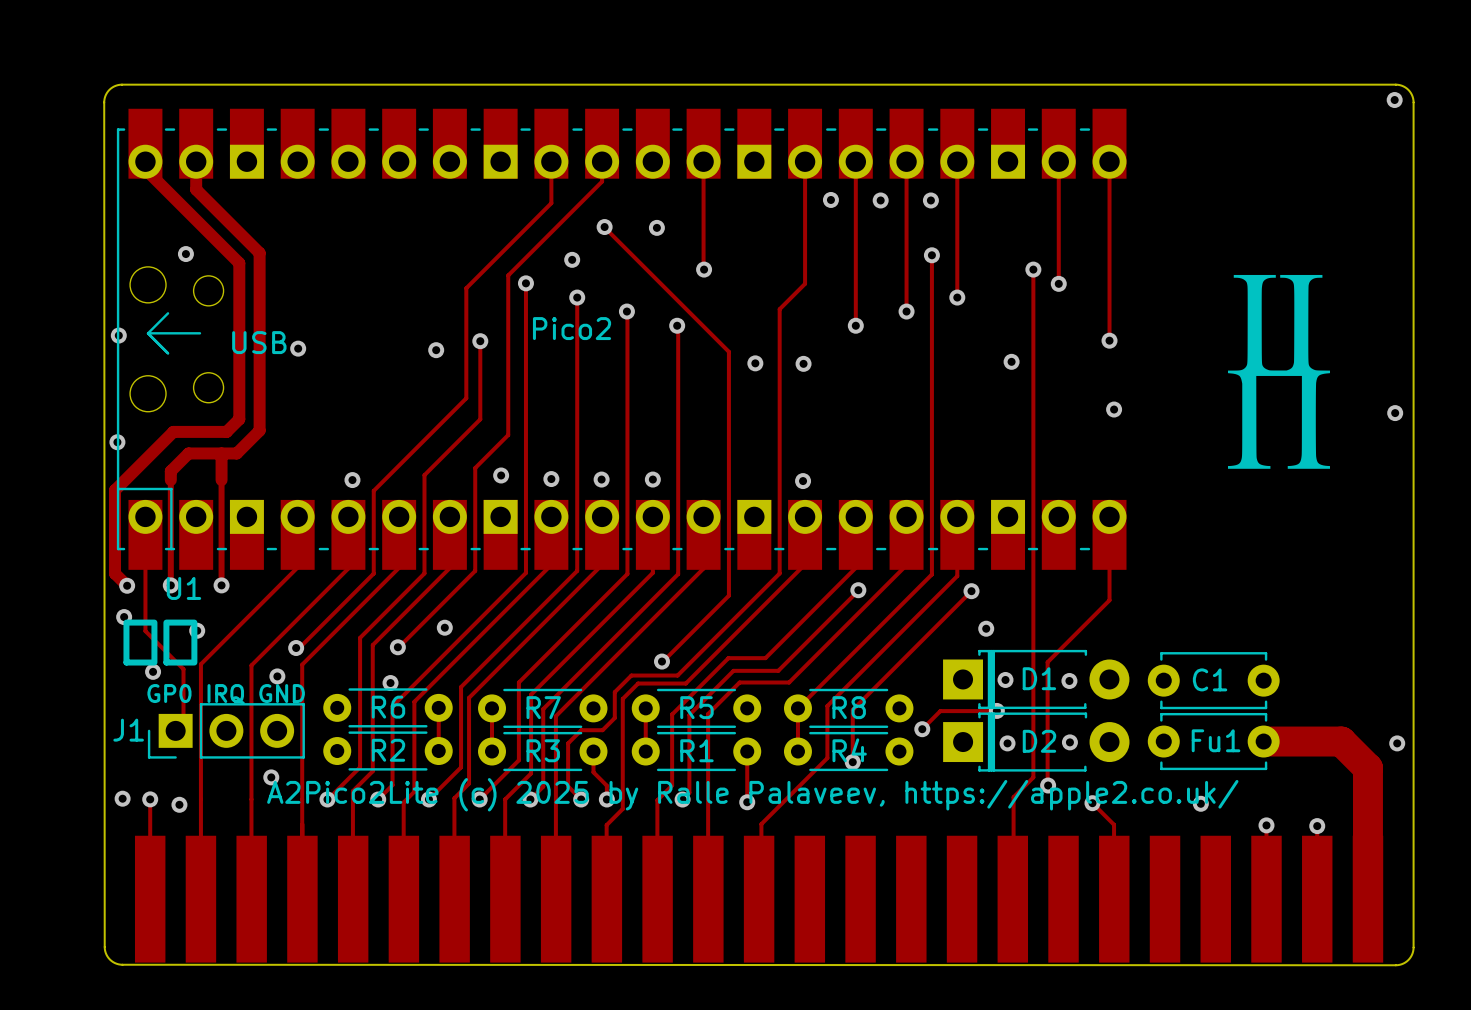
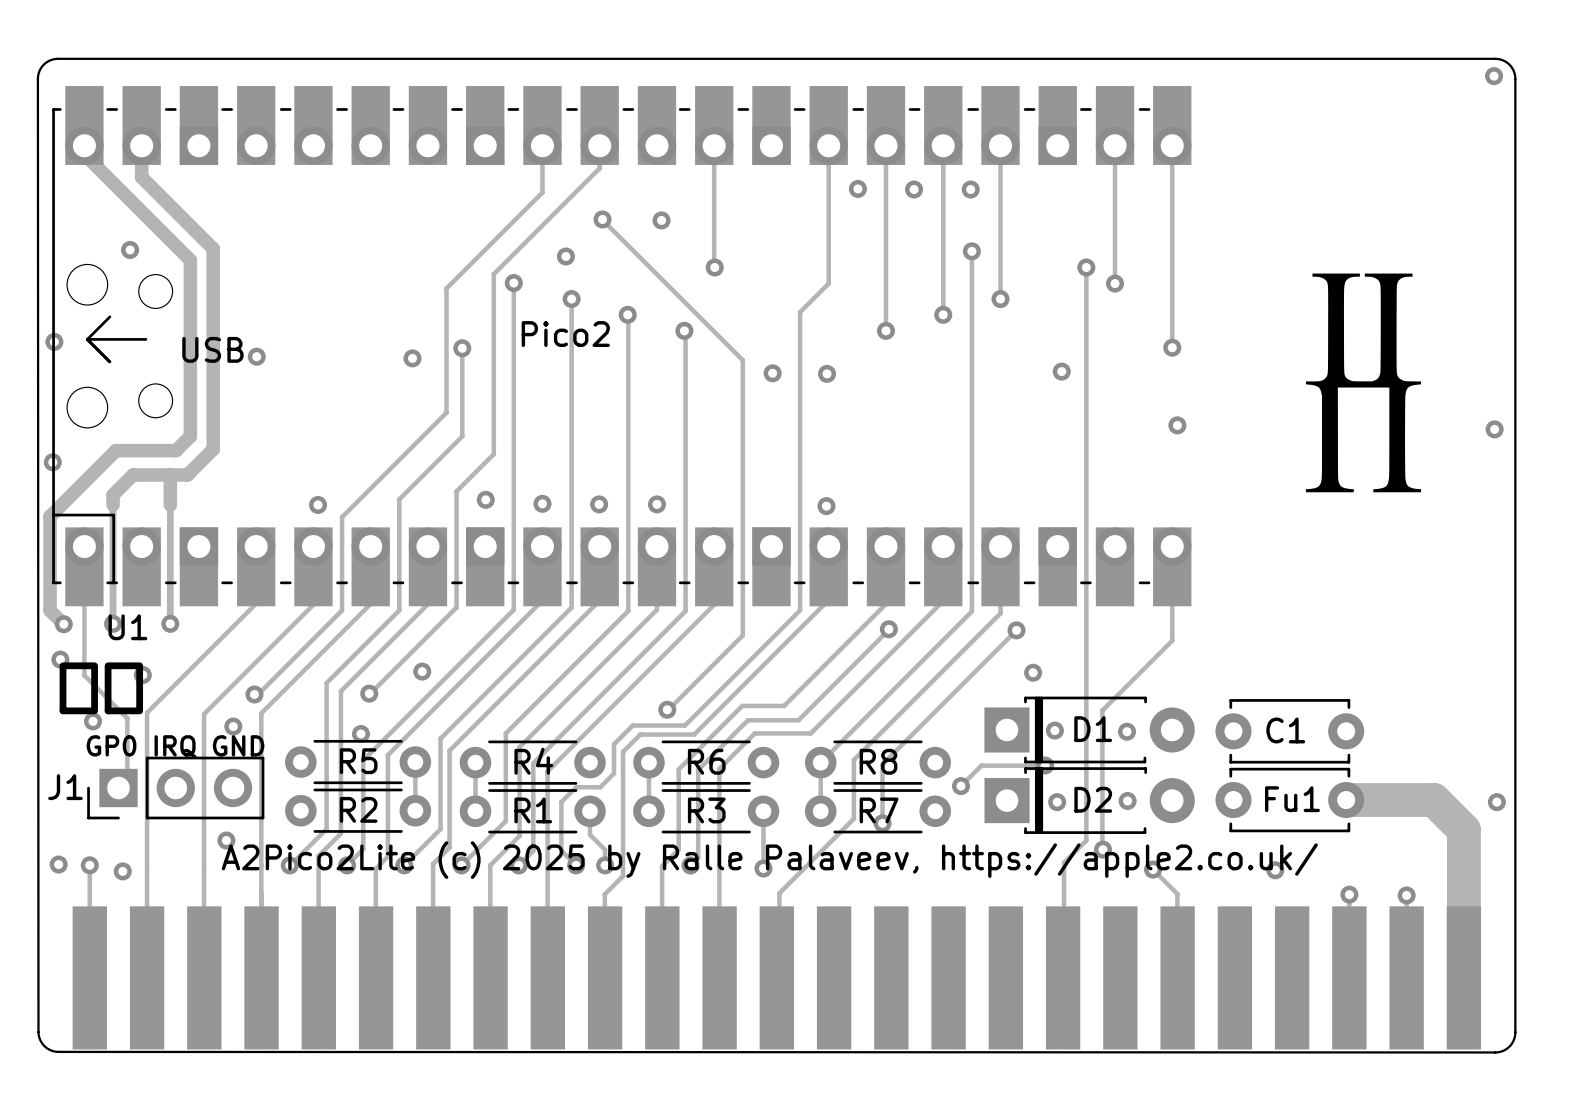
R6 name: R6 (388, 707) -> R5 (358, 761)
R7 name: R7 (543, 707) -> R4 (533, 761)
R5 name: R5 (696, 707) -> R6 (706, 761)
R3 name: R3 (543, 750) -> R1 (533, 810)
R1 name: R1 (696, 750) -> R3 (706, 810)
R4 name: R4 (849, 750) -> R7 (879, 810)

